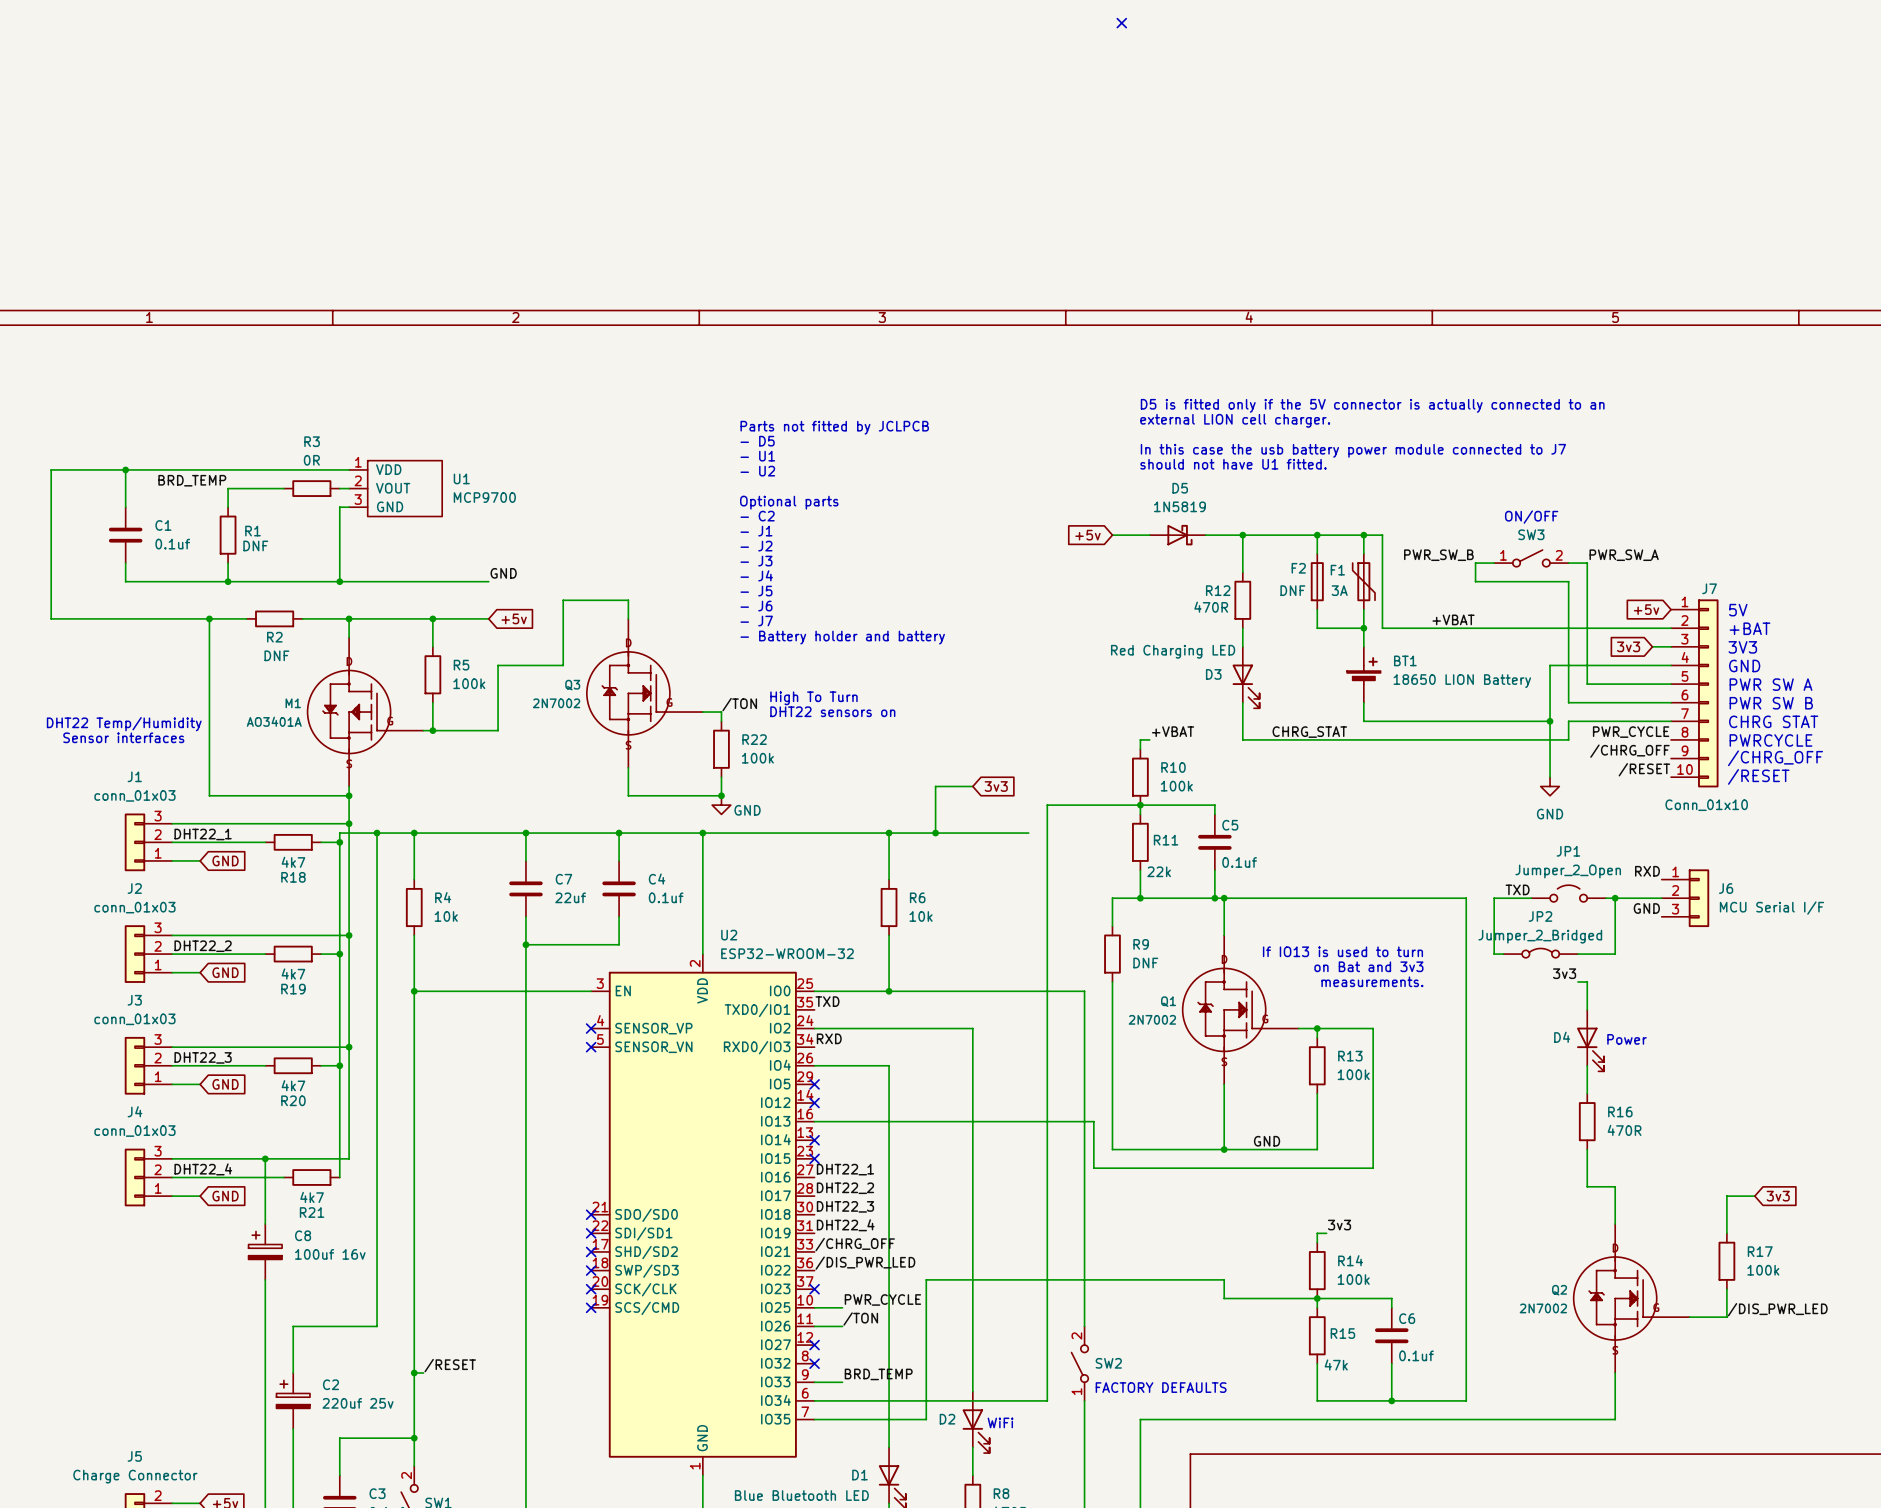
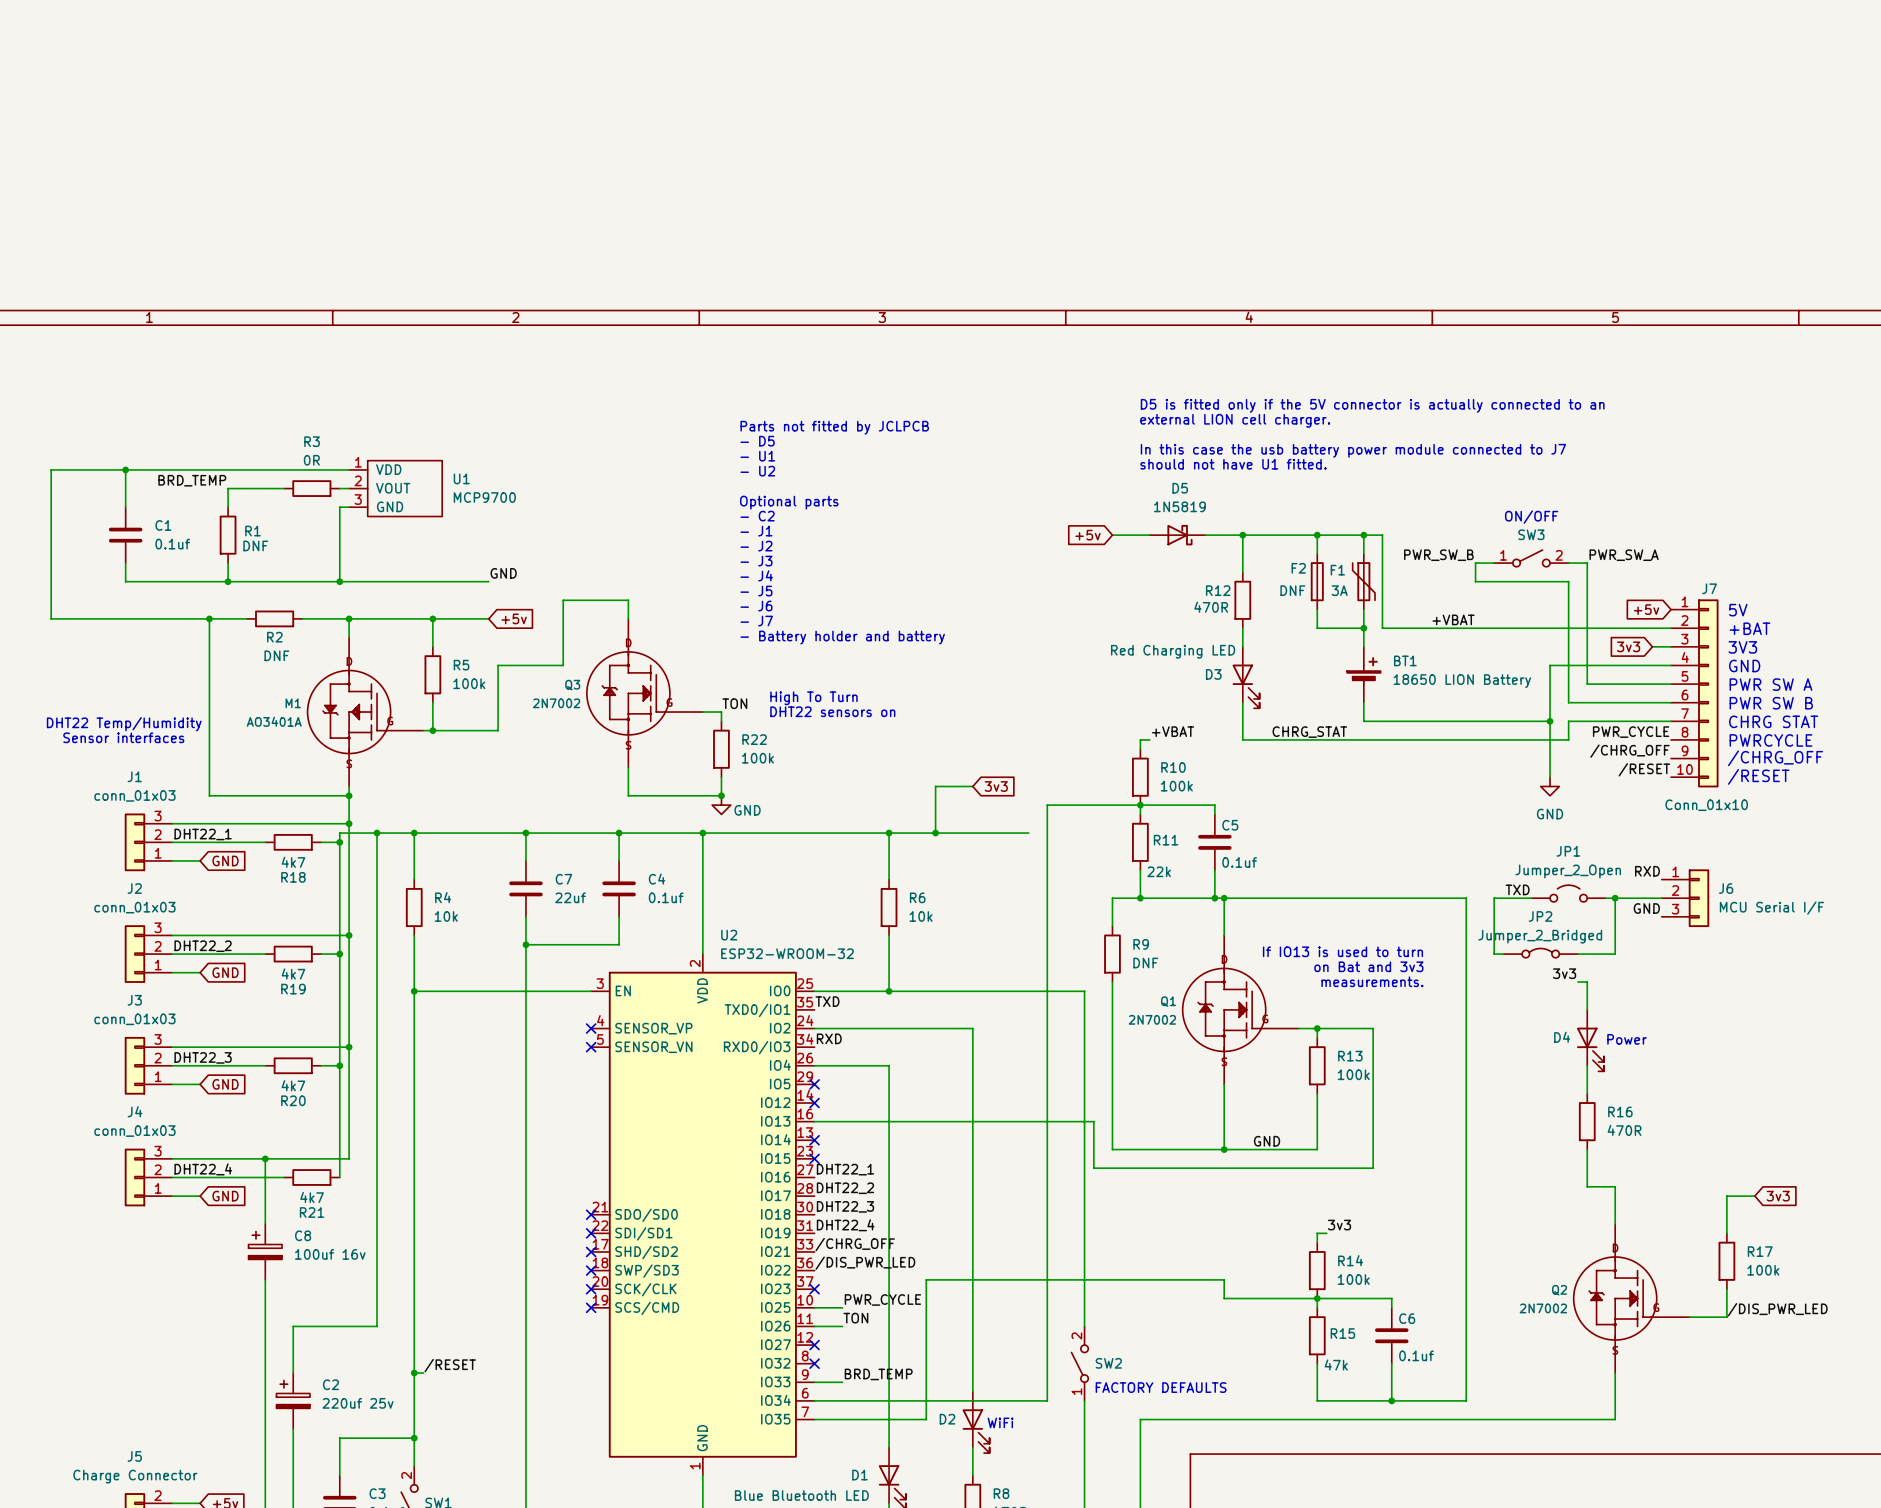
no-connect mark: (1121, 23) -> none
label: /TON (739, 704) -> TON (734, 703)
label: /TON (860, 1319) -> TON (855, 1318)

